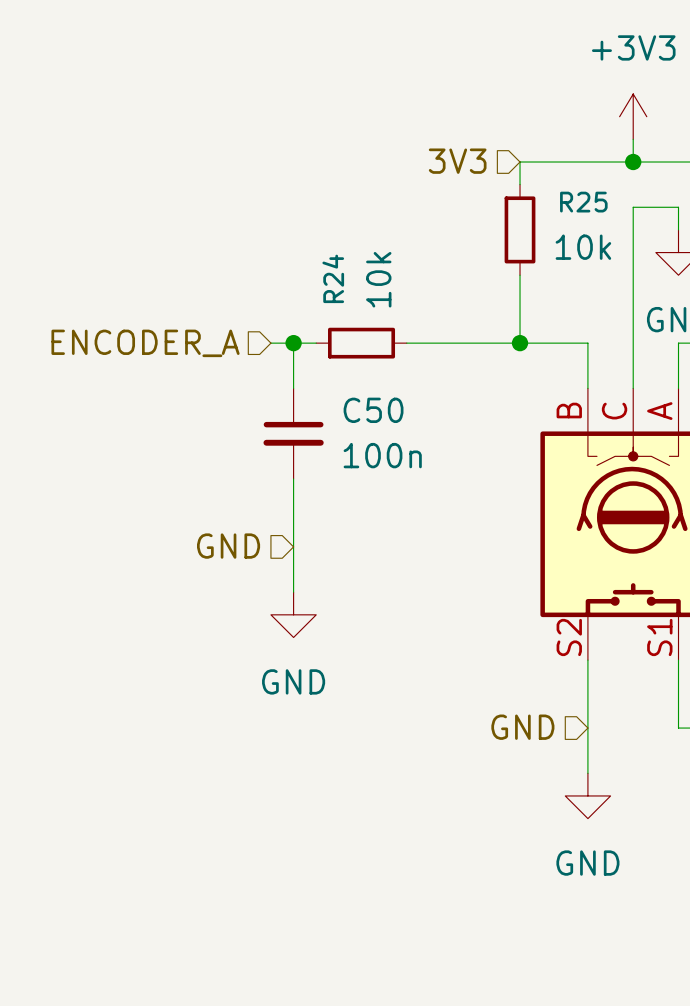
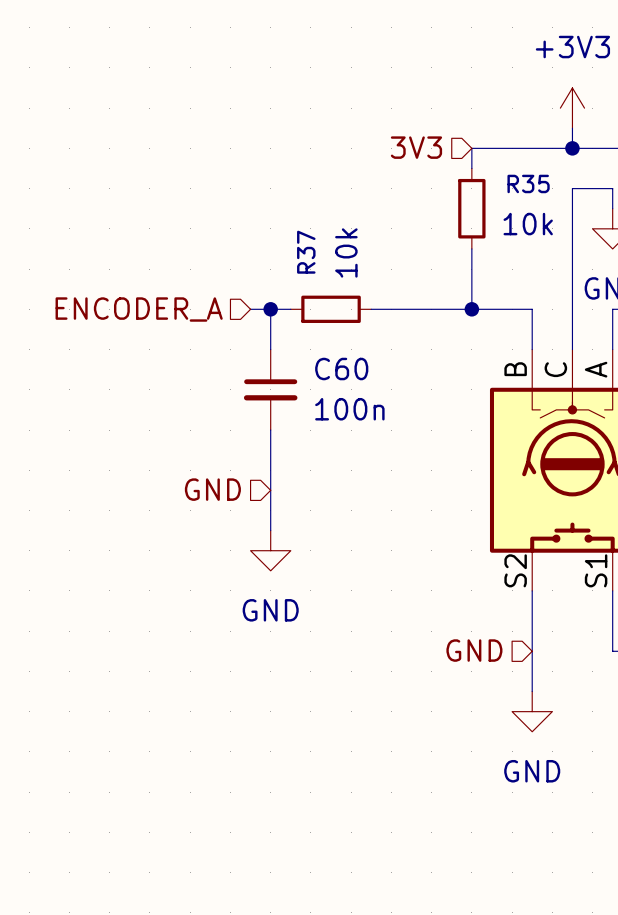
R25 name: R25 (583, 202) -> R35 (528, 183)
R24 name: R24 (333, 278) -> R37 (306, 252)
C50 name: C50 (373, 410) -> C60 (341, 369)

